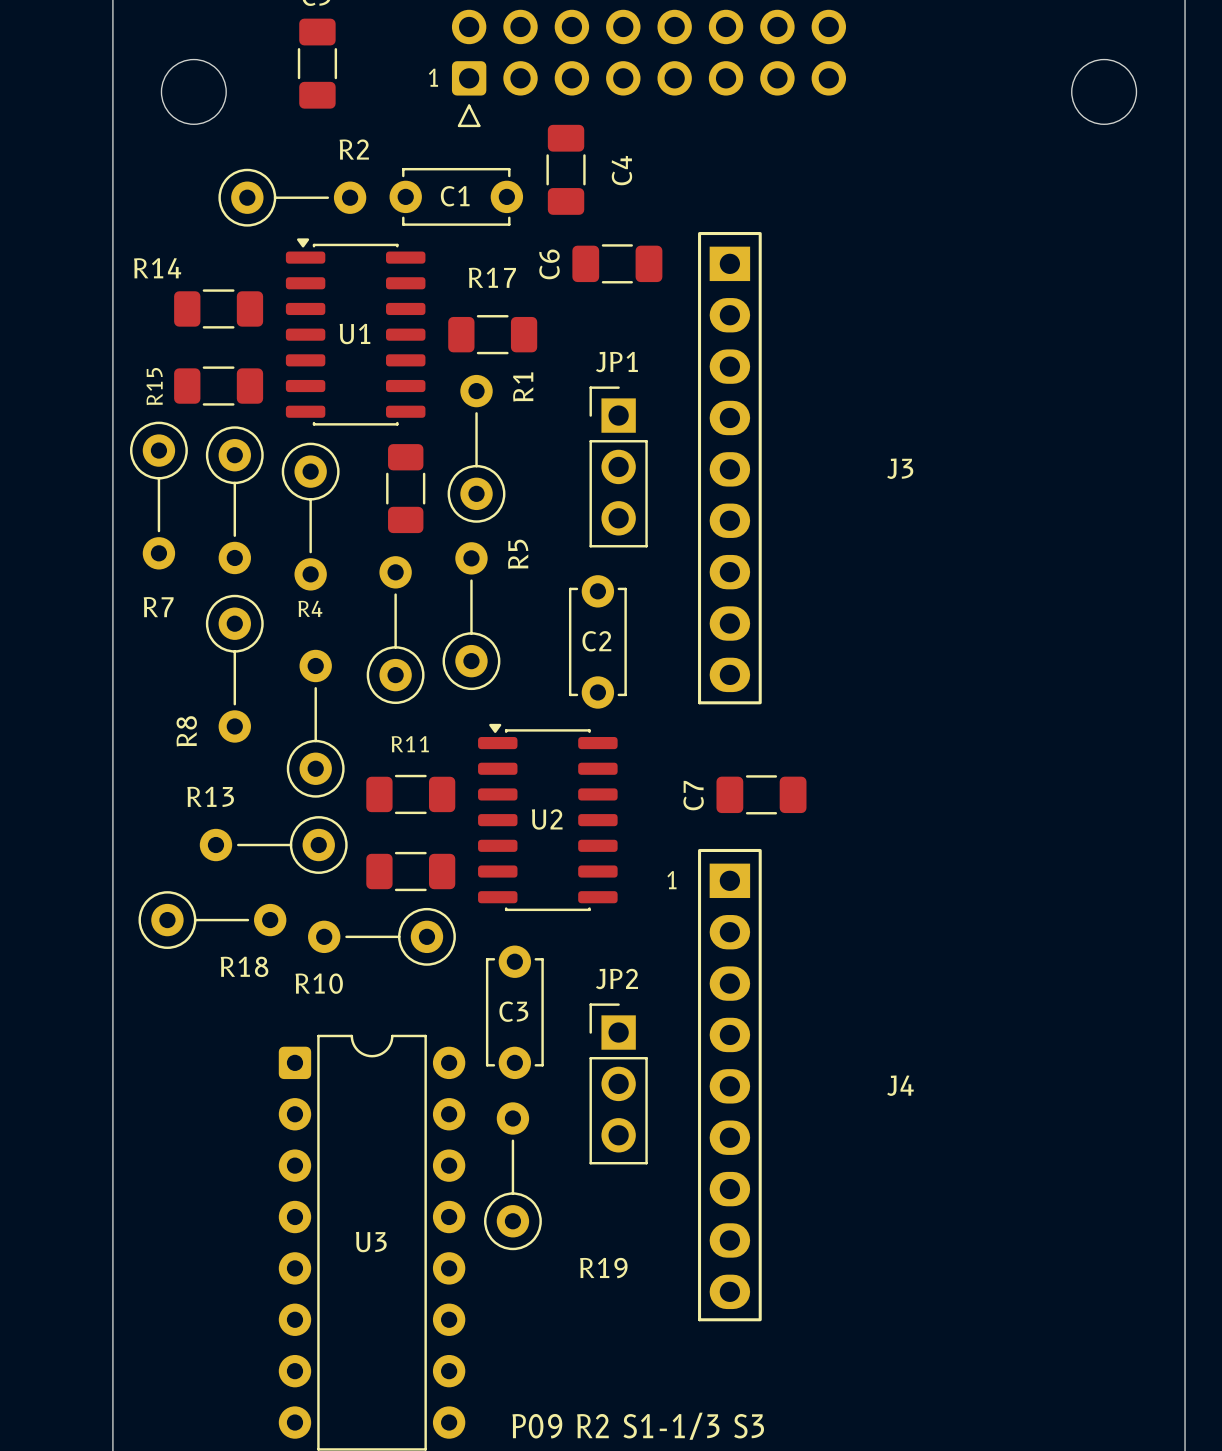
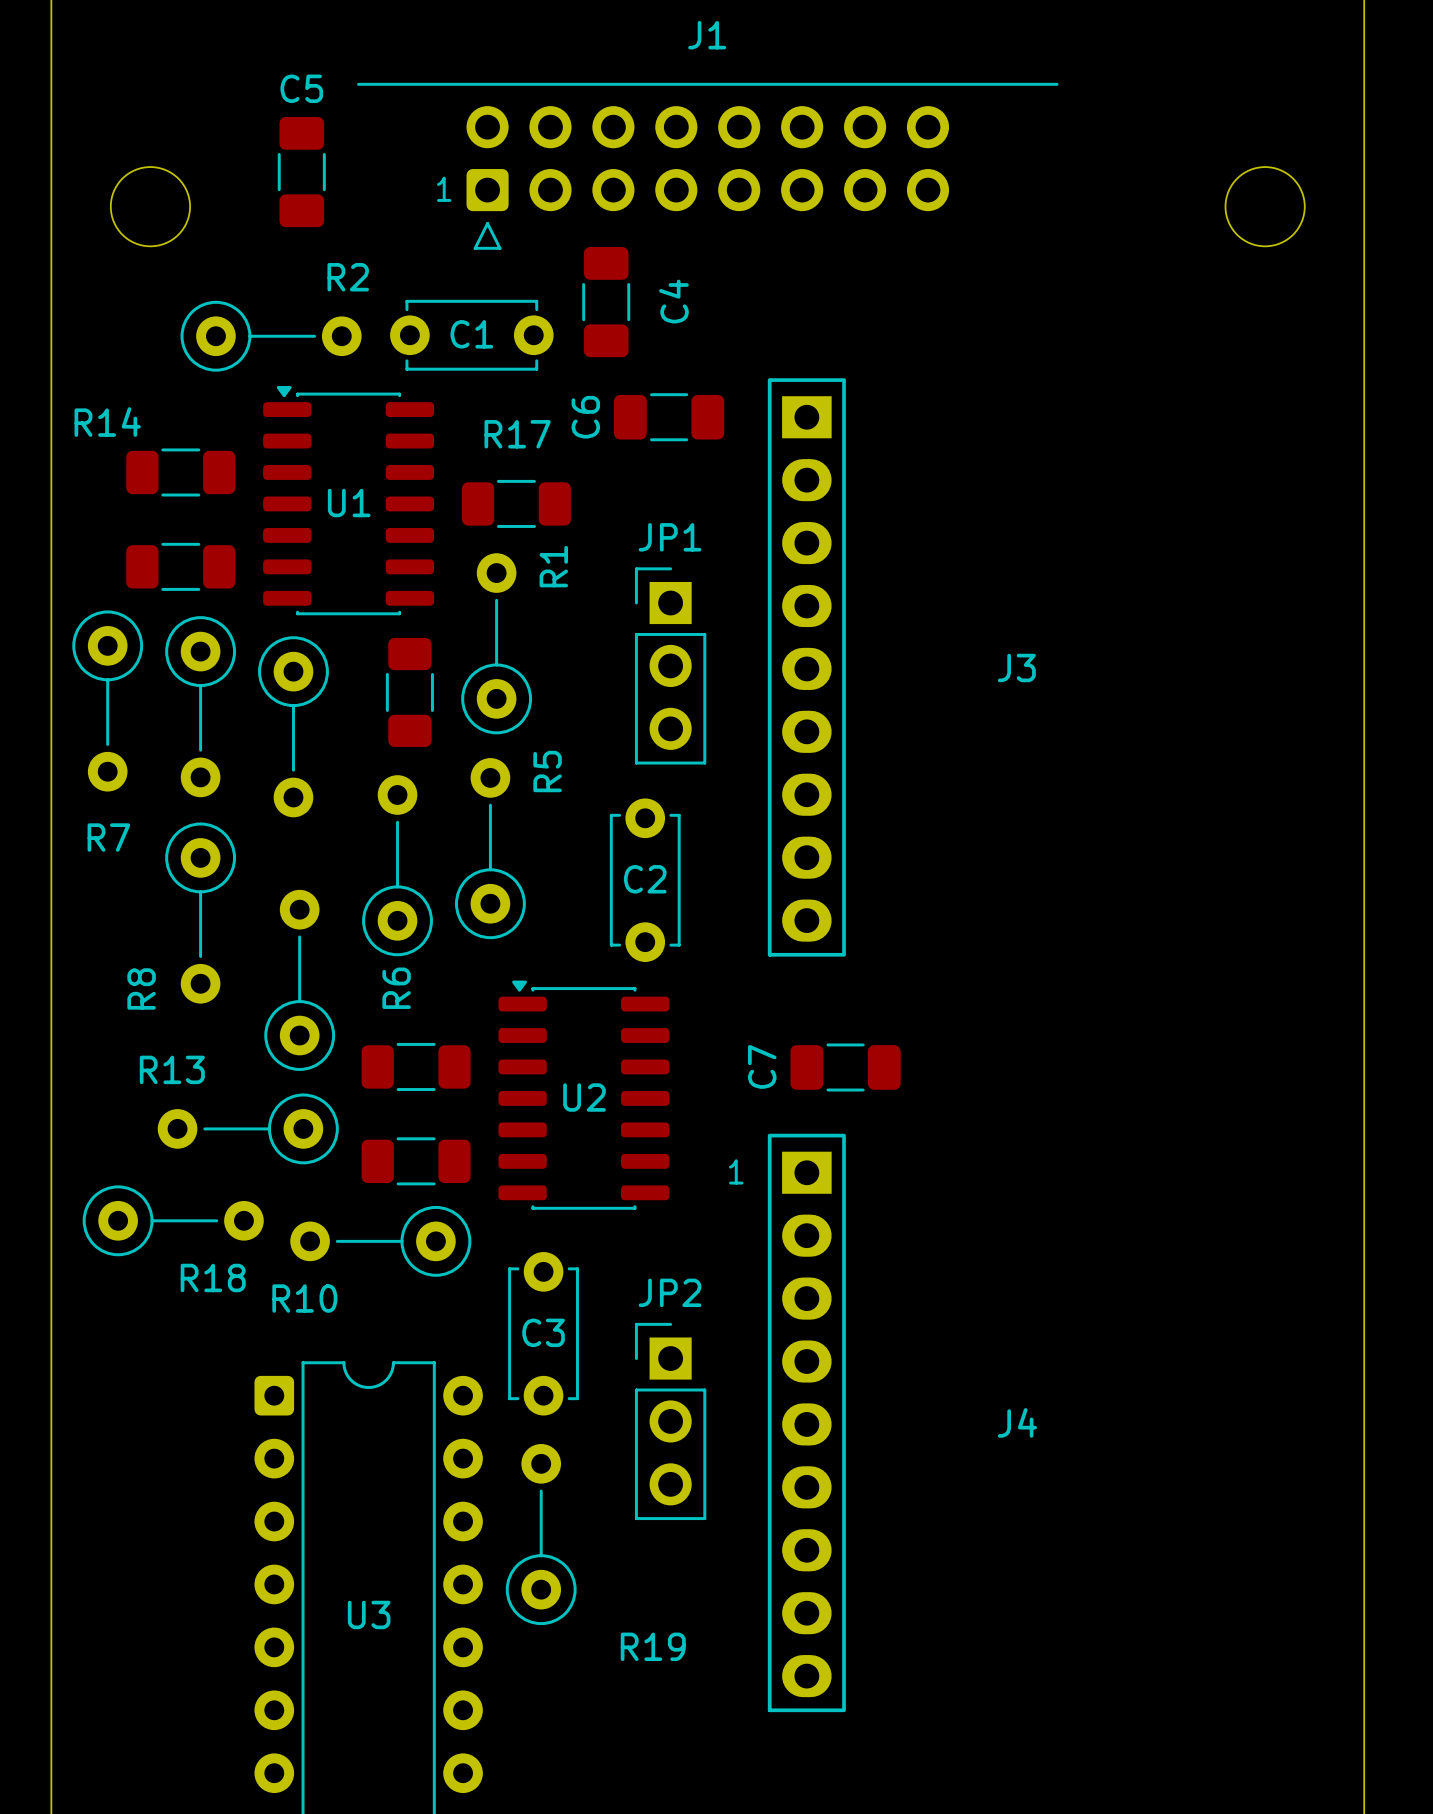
R15 name: R15 (154, 386) -> none
R4 name: R4 (310, 608) -> none
R6 name: none -> R6 (396, 988)
R11 name: R11 (410, 744) -> none

